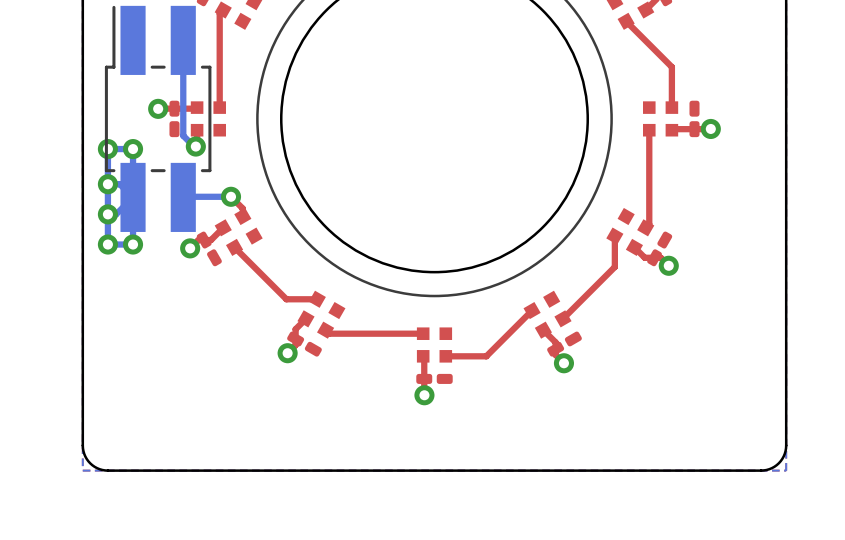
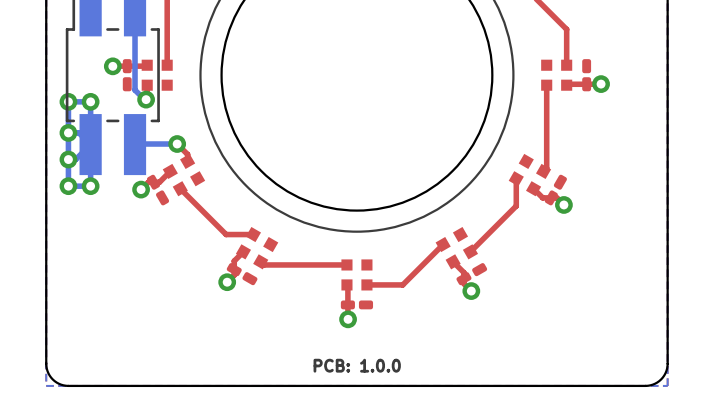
text: none -> PCB: 1.0.0 (357, 365)

